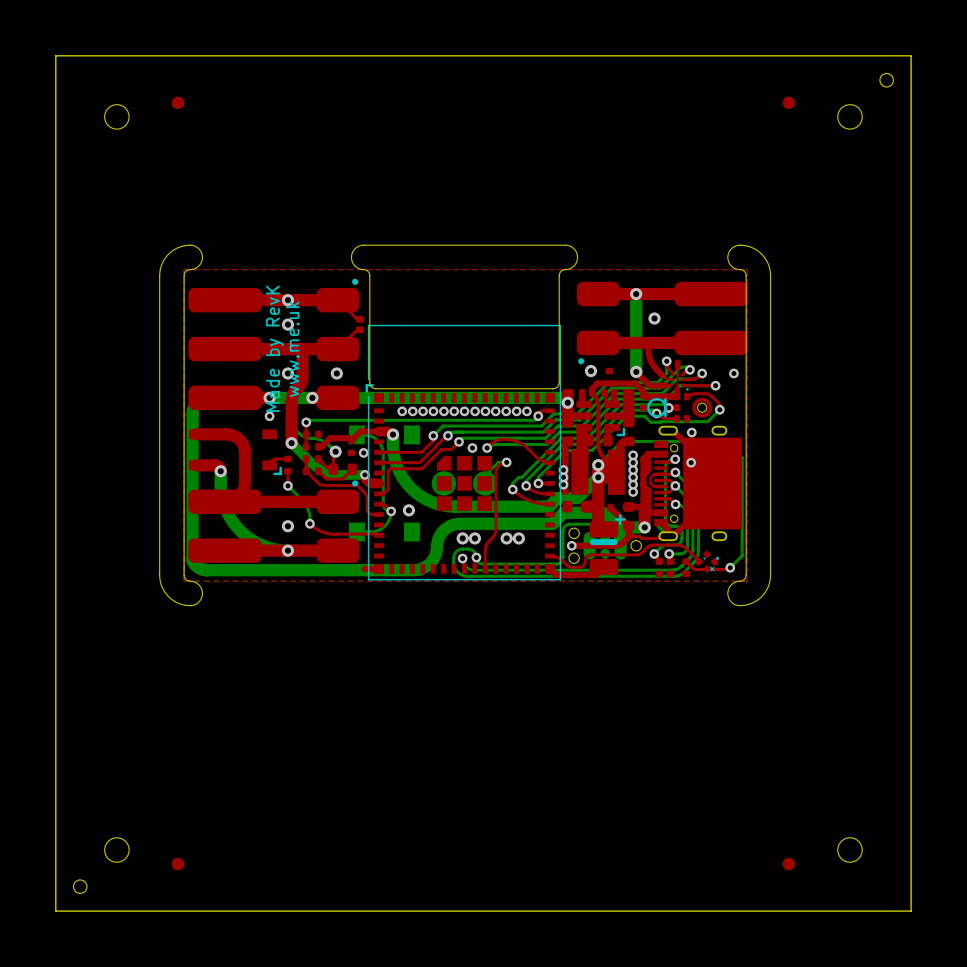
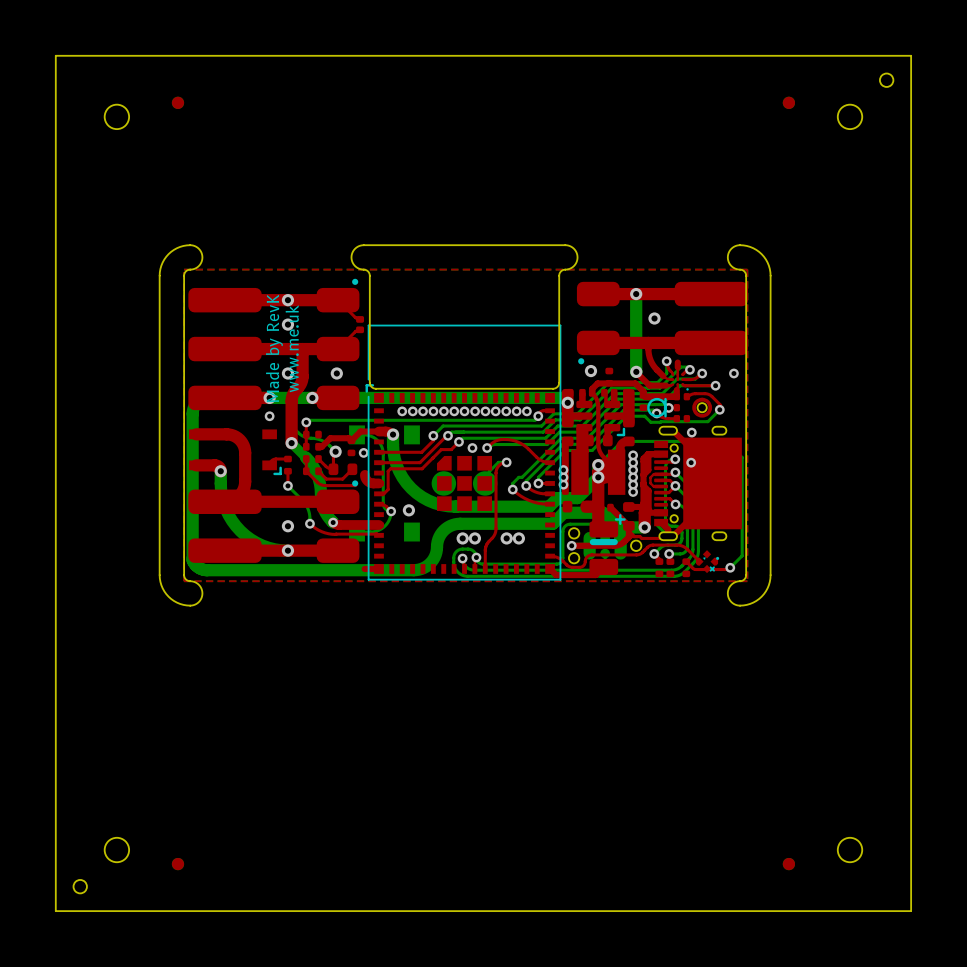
bottom track: (305, 457) (315, 466) (329, 473) (364, 474) -> (305, 457) (317, 474) (322, 505) (333, 522)
via position: (364, 474) -> (333, 522)
top track: (355, 485) (366, 494) (368, 512) (378, 514) -> none
top track: none -> (333, 522) (338, 524) (378, 525)

